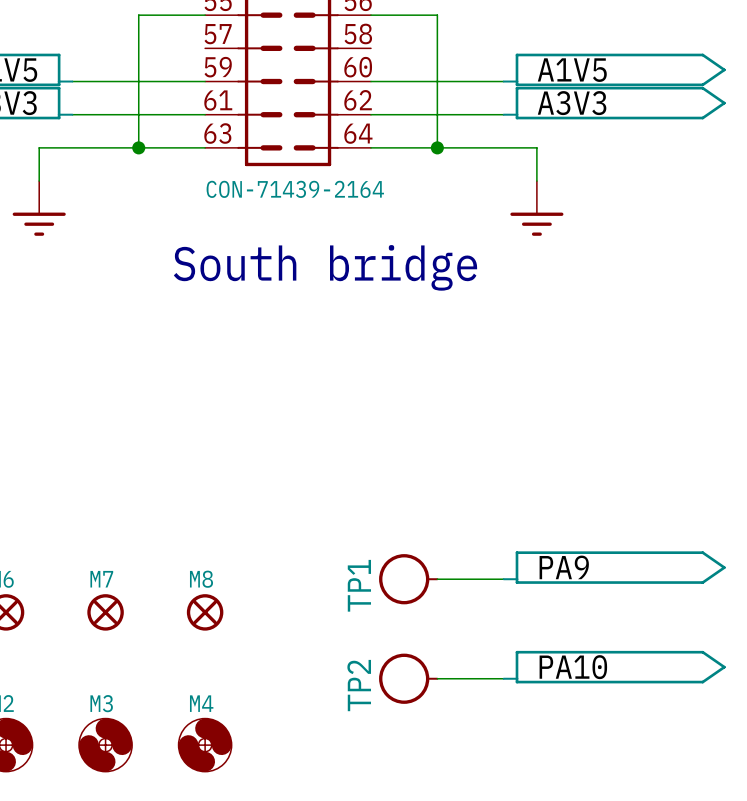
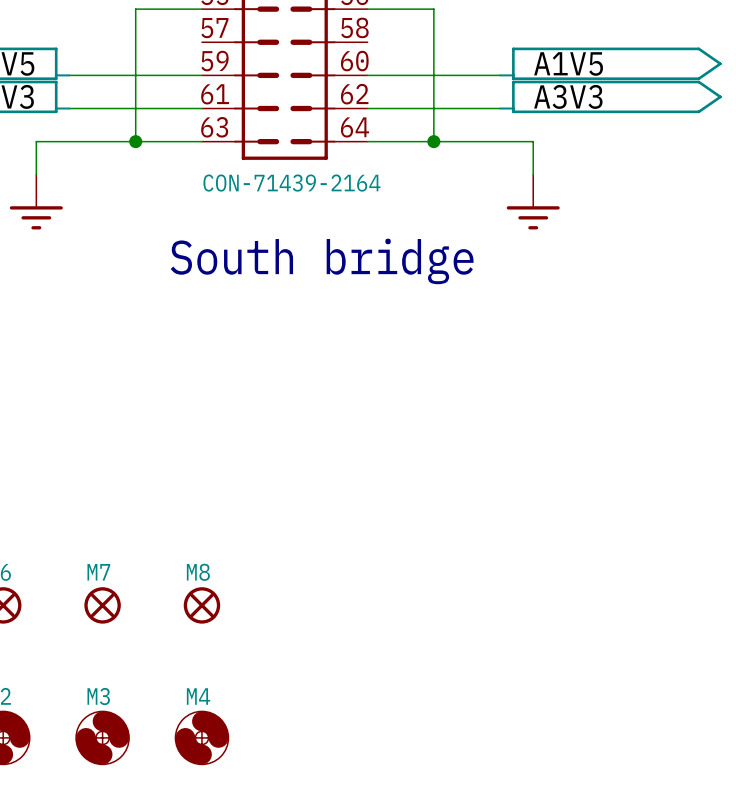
label: PA9 (564, 567) -> none
part: (614, 567) -> none
TP1: (408, 579) -> none
wire: (437, 579) (503, 579) -> none
label: PA10 (573, 667) -> none
part: (614, 667) -> none
TP2: (408, 678) -> none
wire: (437, 678) (503, 678) -> none

